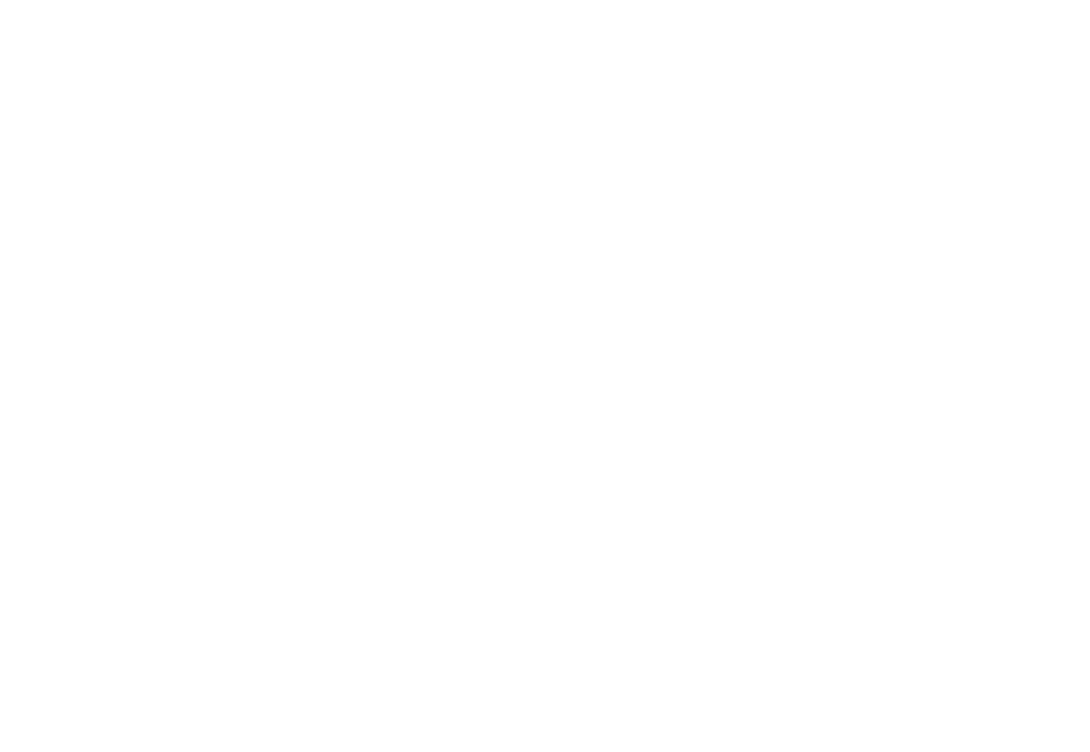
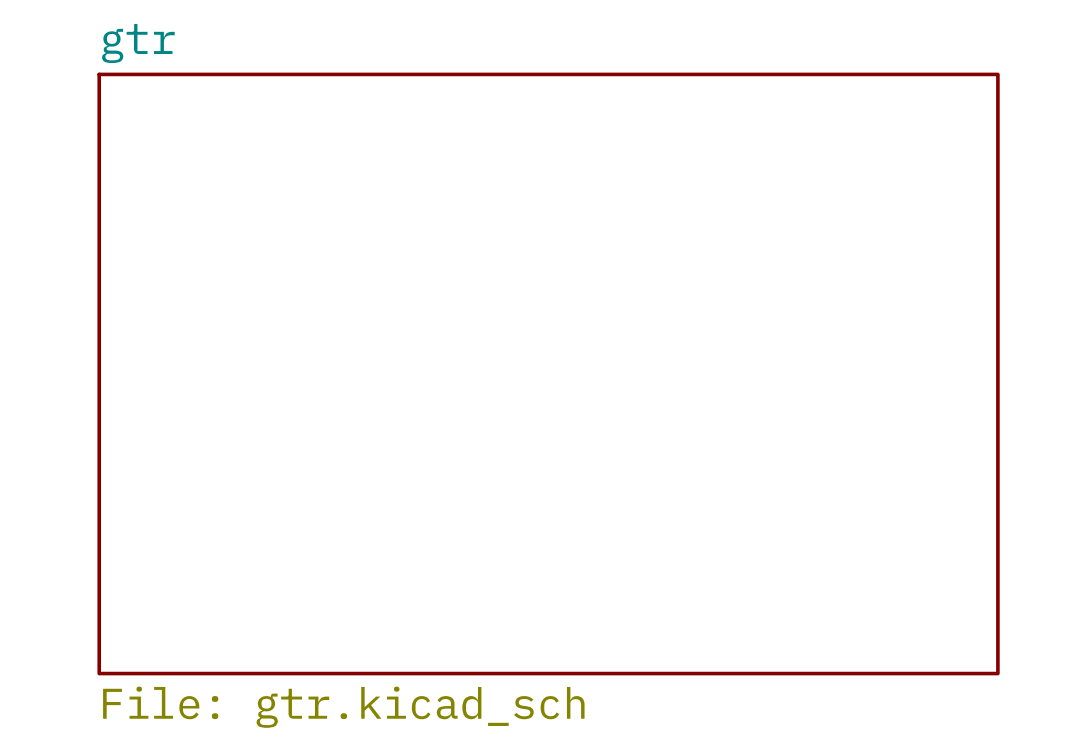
sheet gtr: none -> File: gtr.kicad_sch (548, 373)

